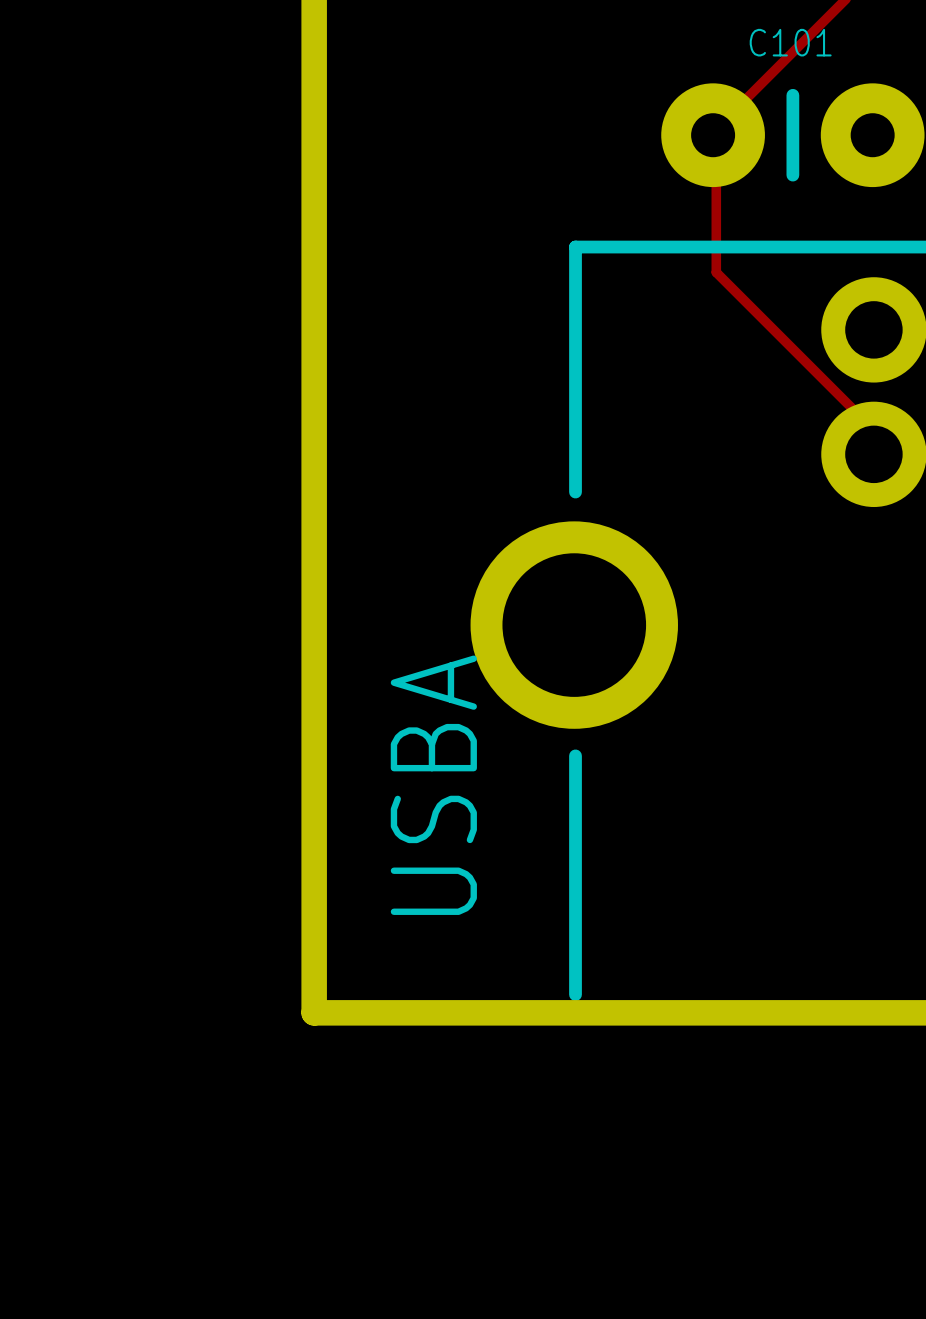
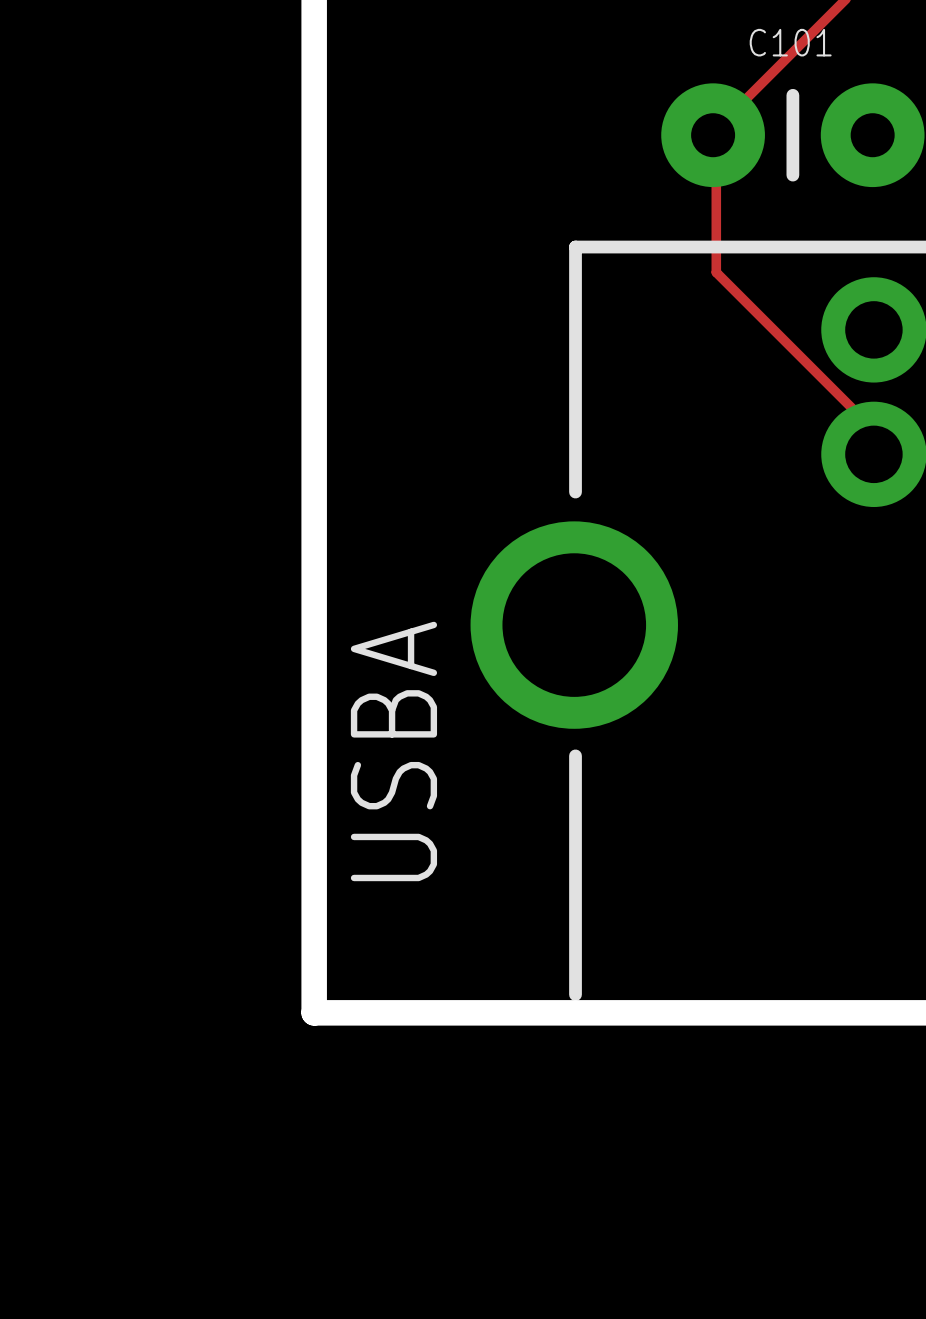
USBA name position: USBA (433, 785) -> USBA (393, 751)

